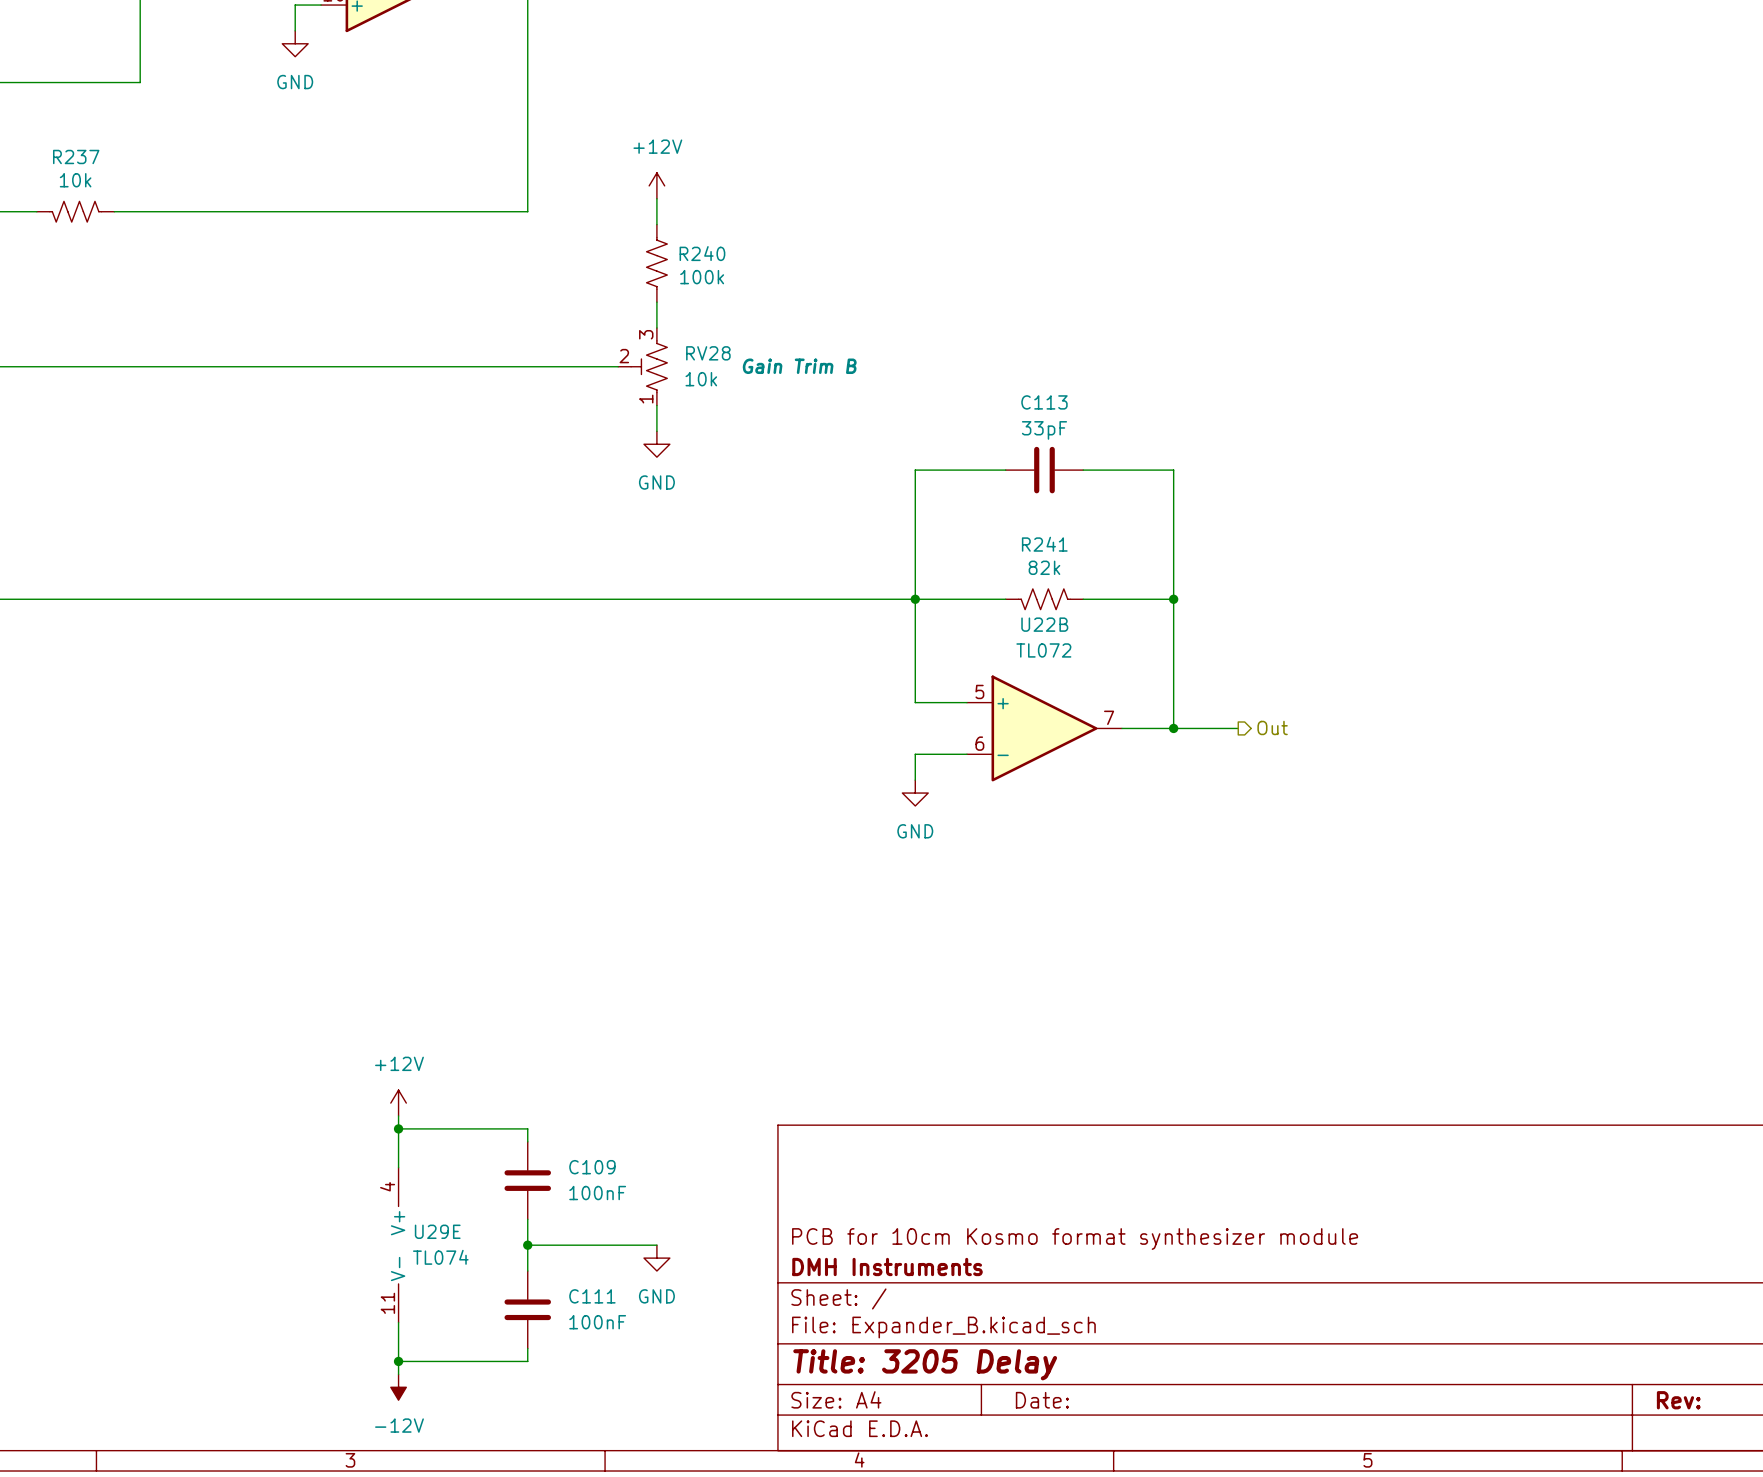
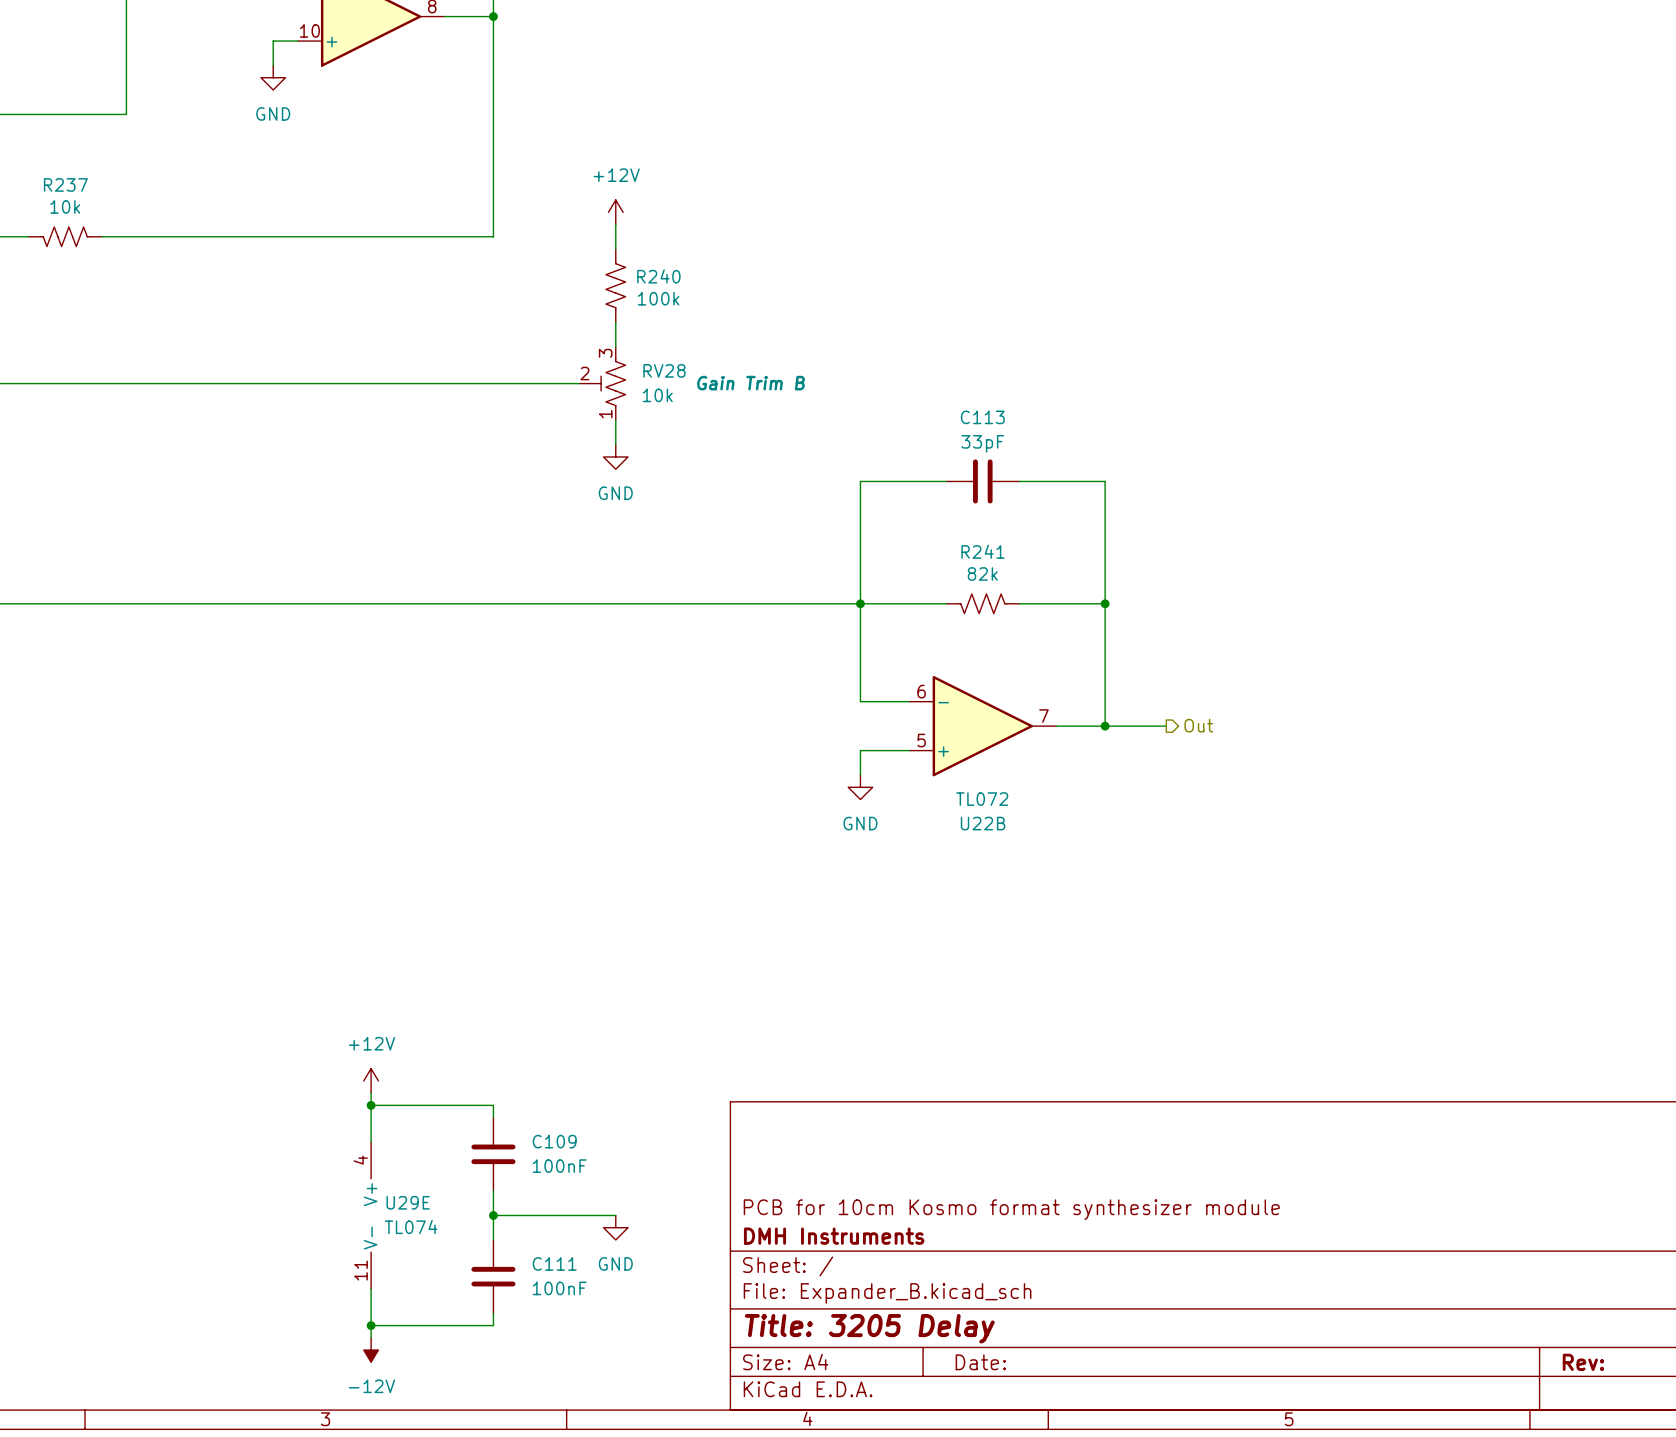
U22B flip: as is (1044, 728) -> up-down (982, 726)

